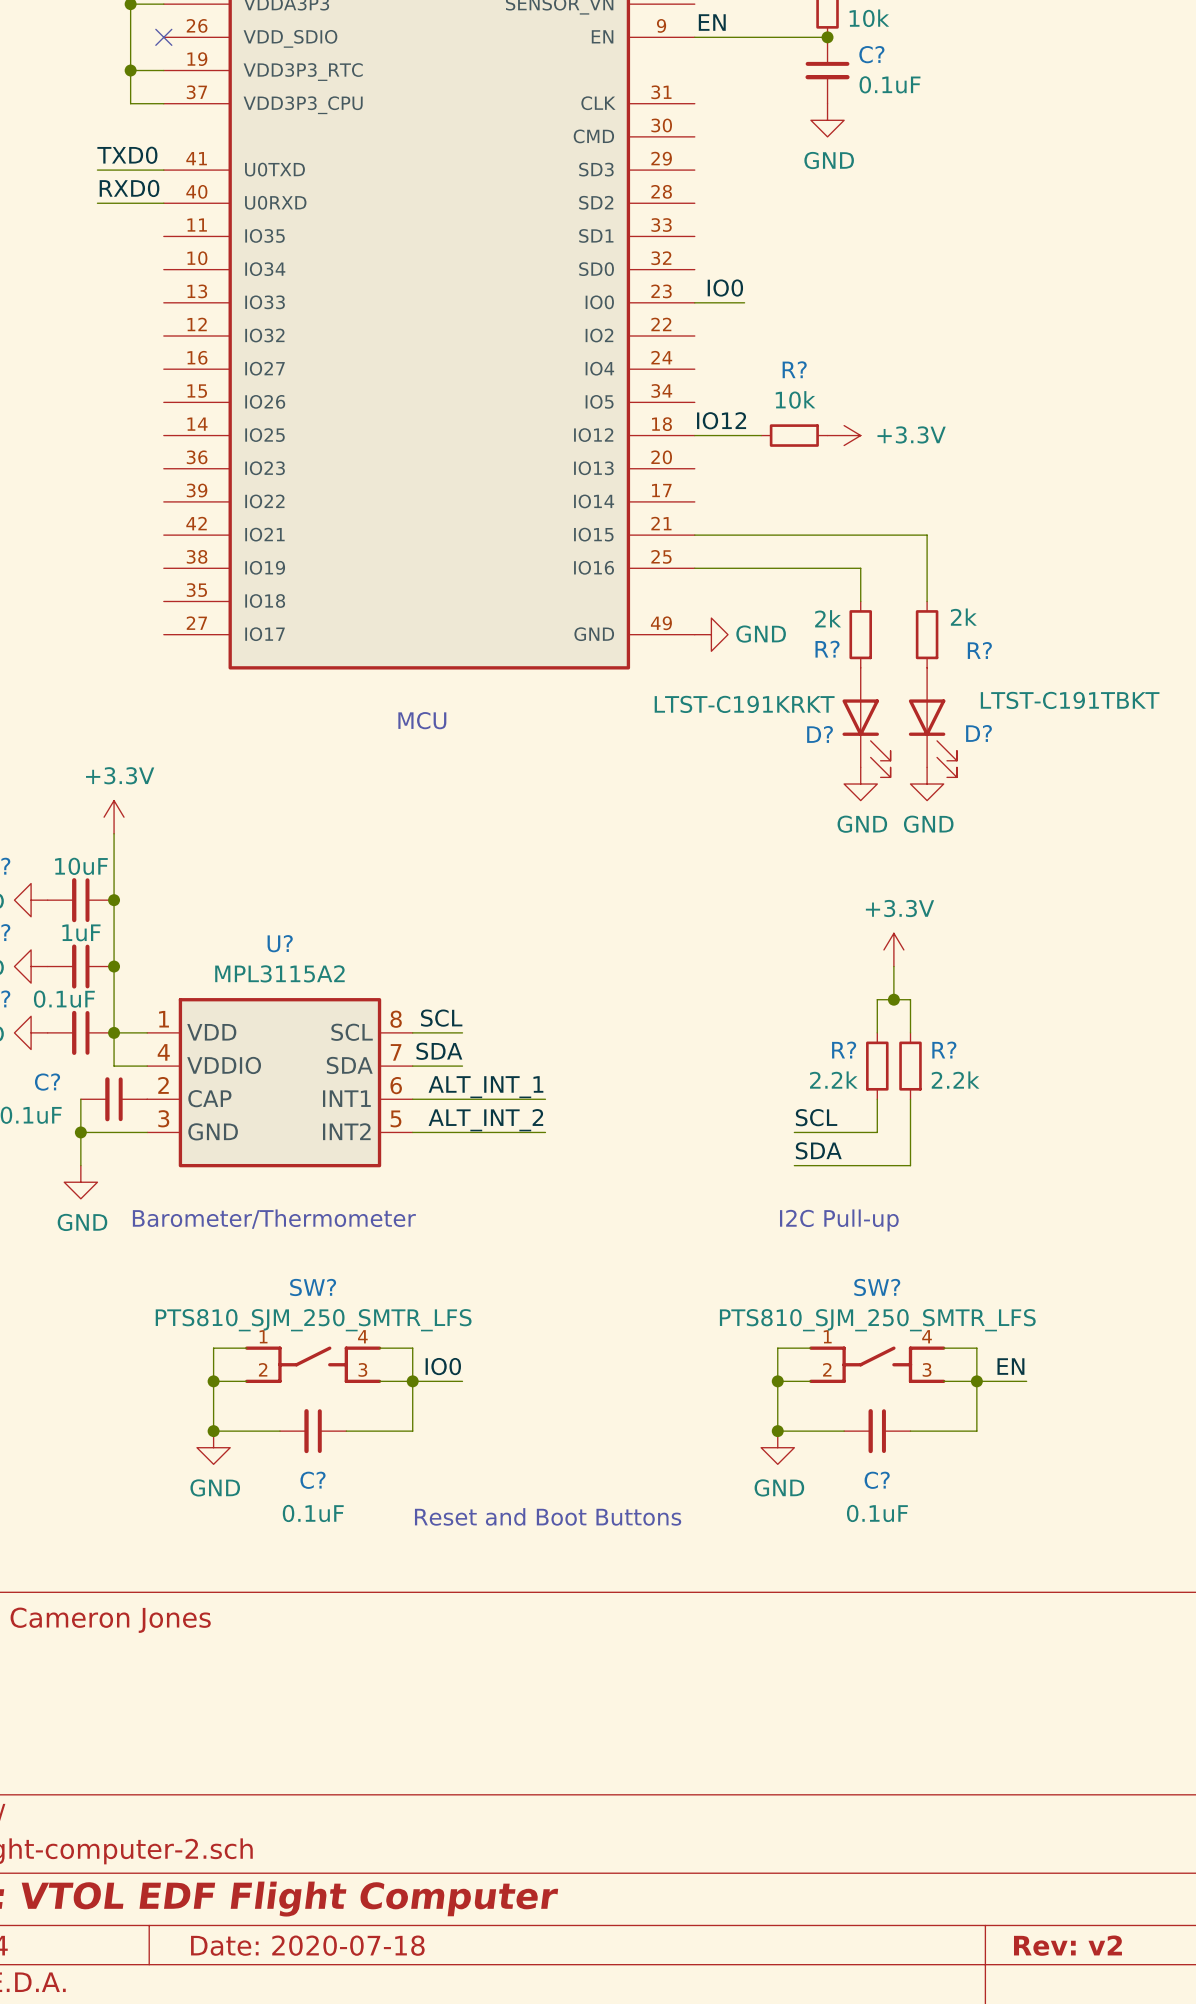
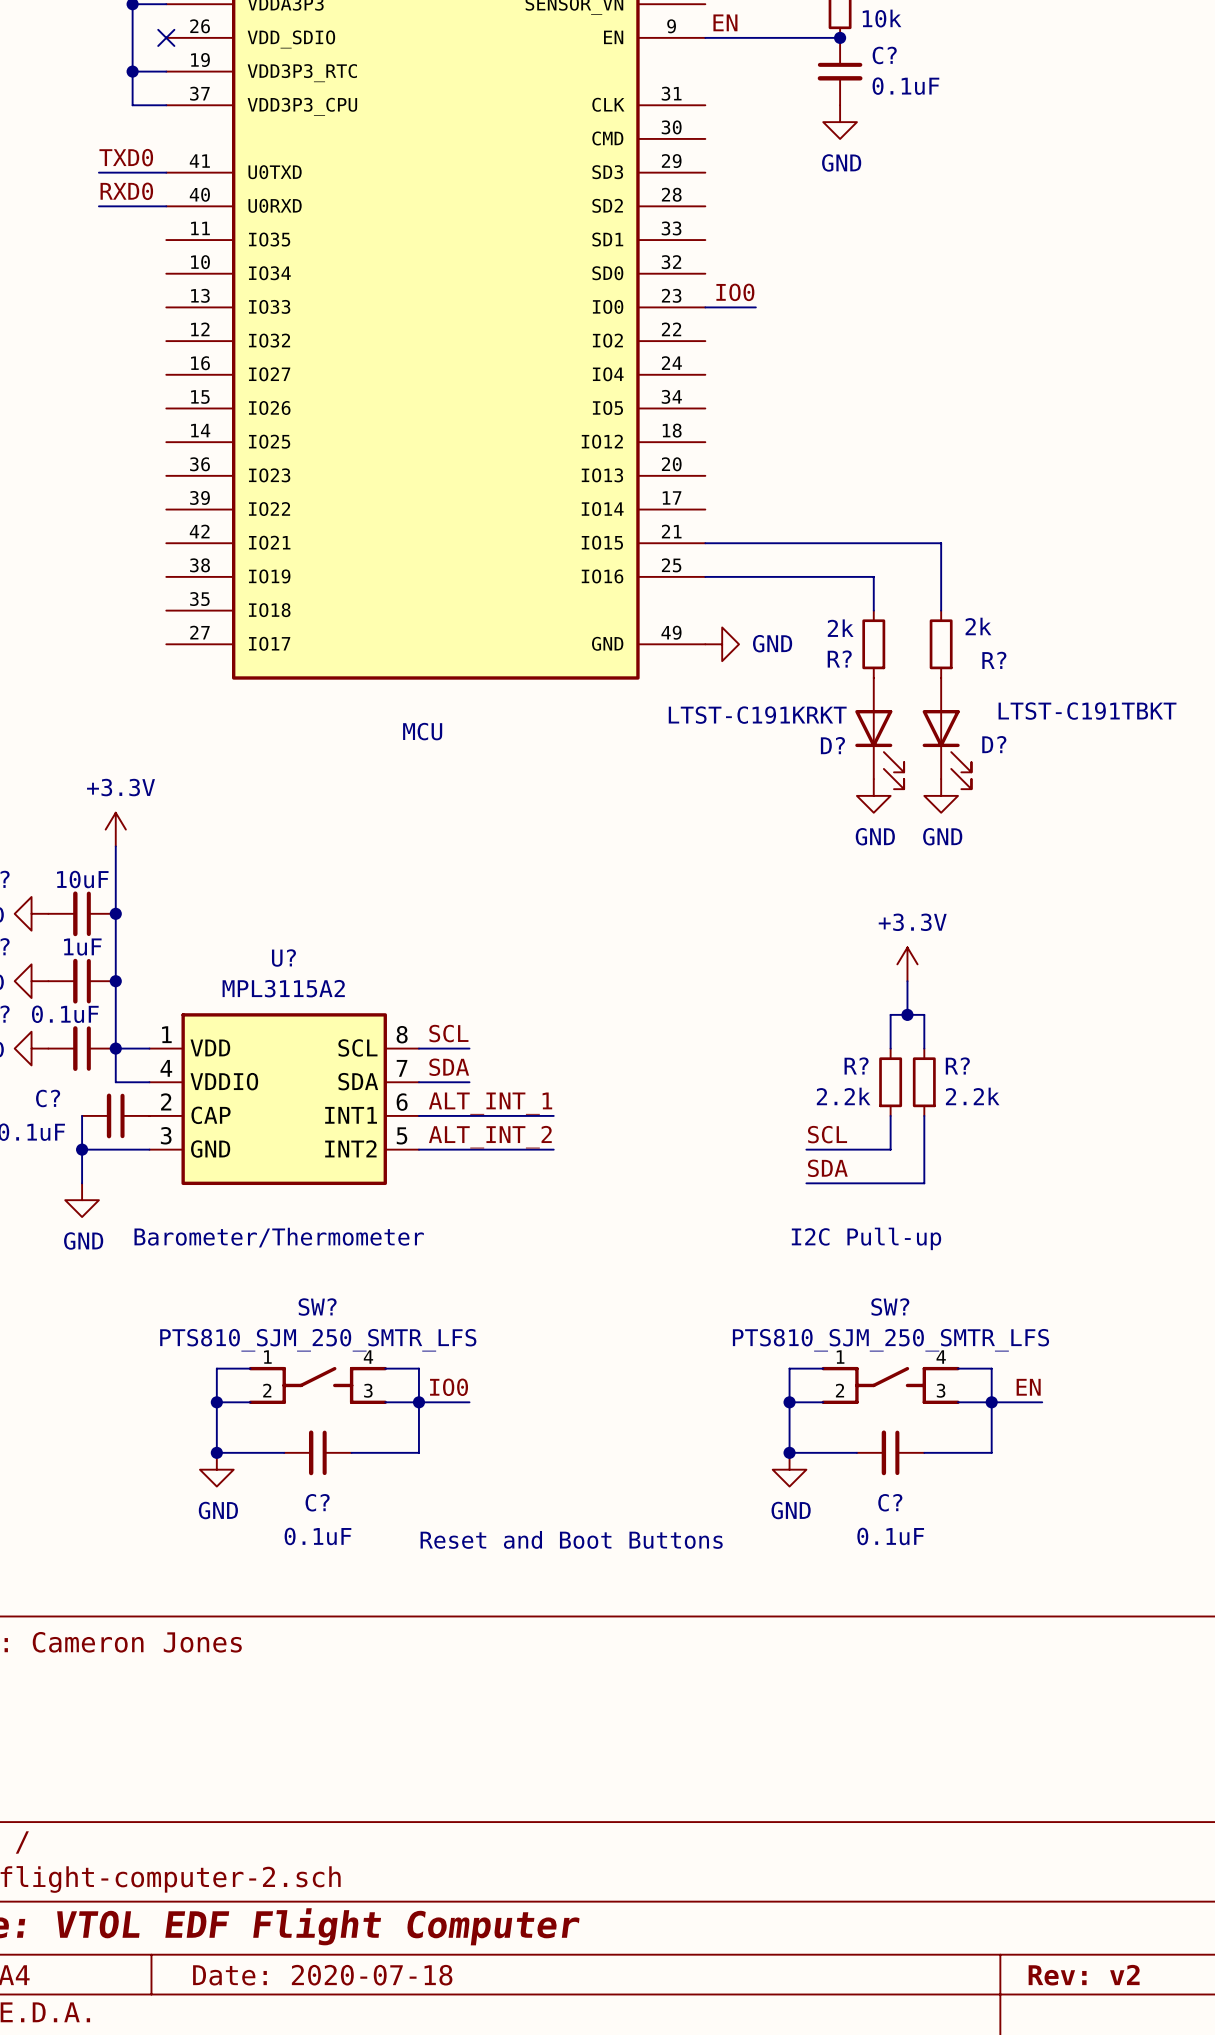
label: IO12 (721, 420) -> none
wire: (694, 435) (761, 435) -> none
R?: 10k (794, 435) -> none
power symbol: +3.3V (844, 435) -> none

